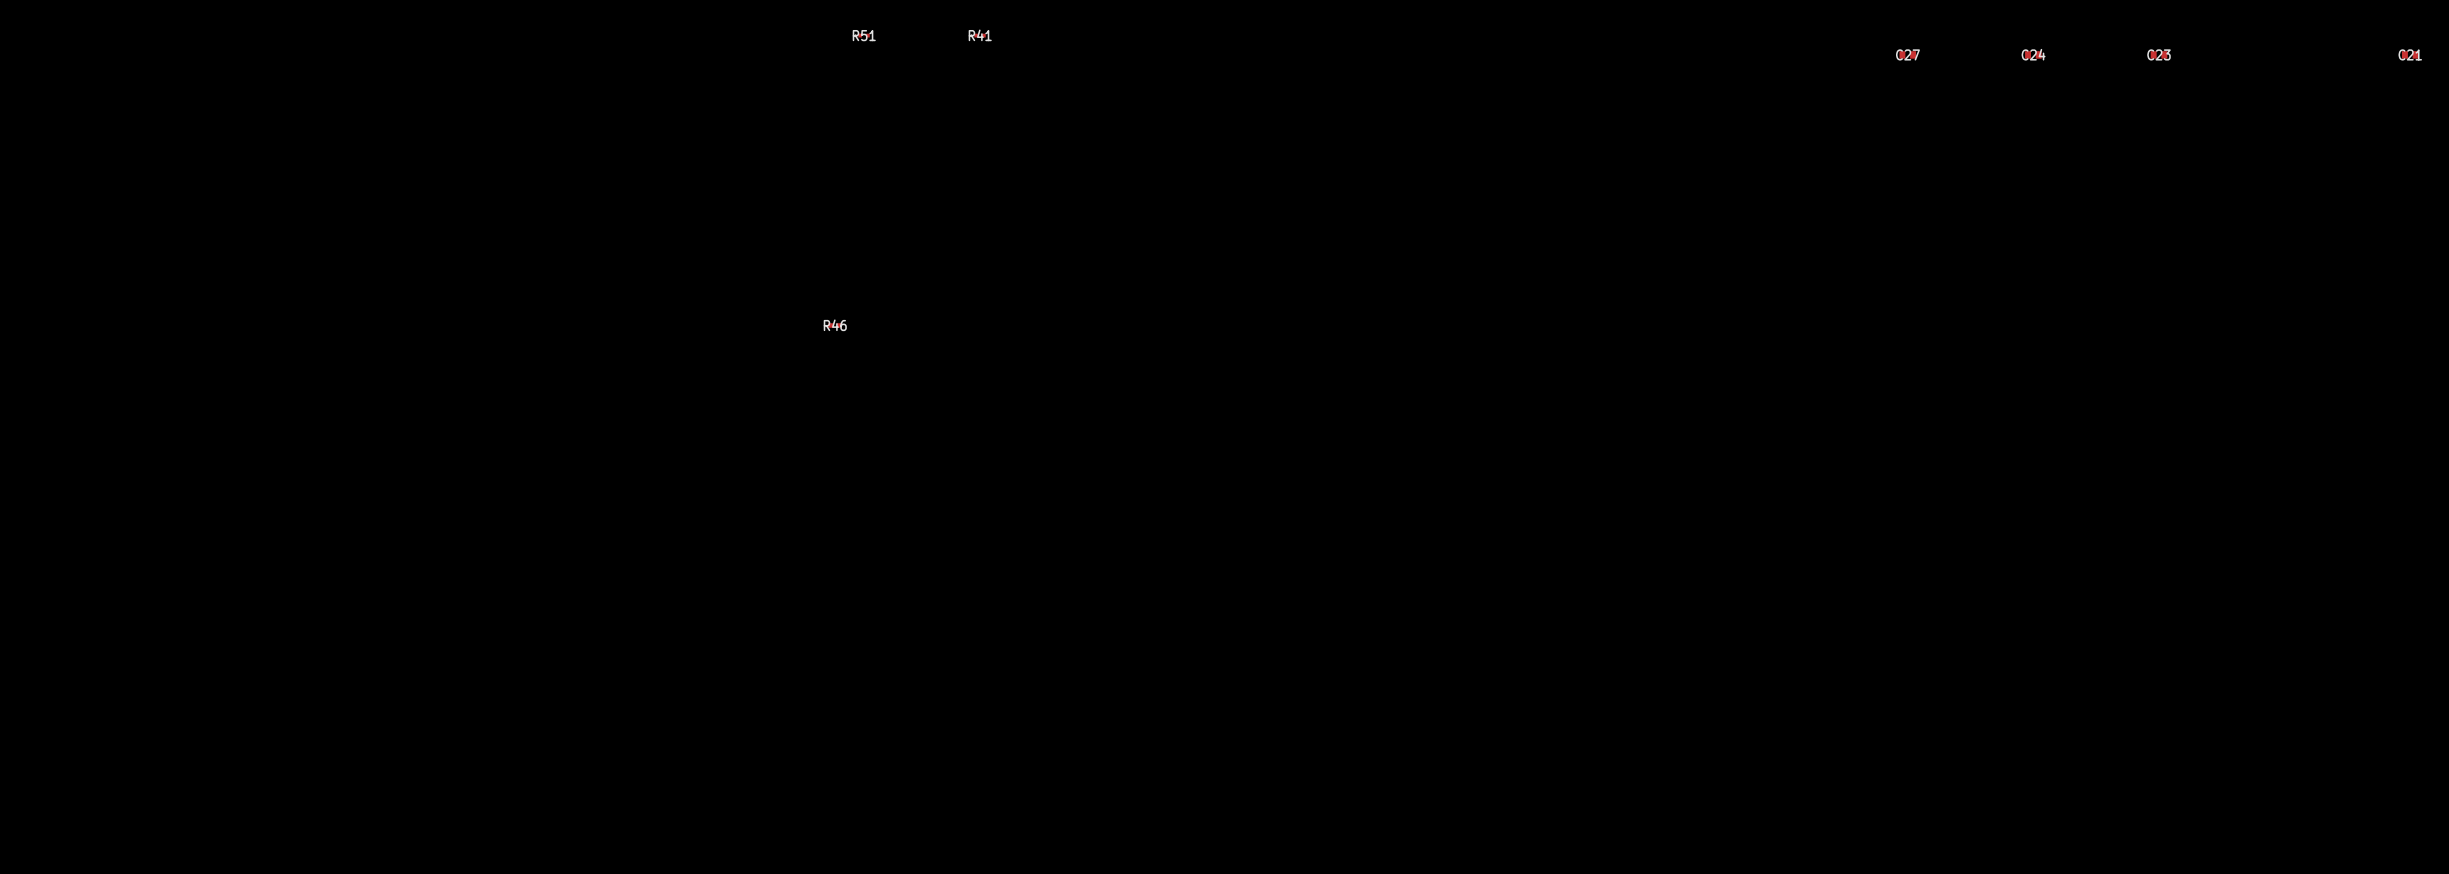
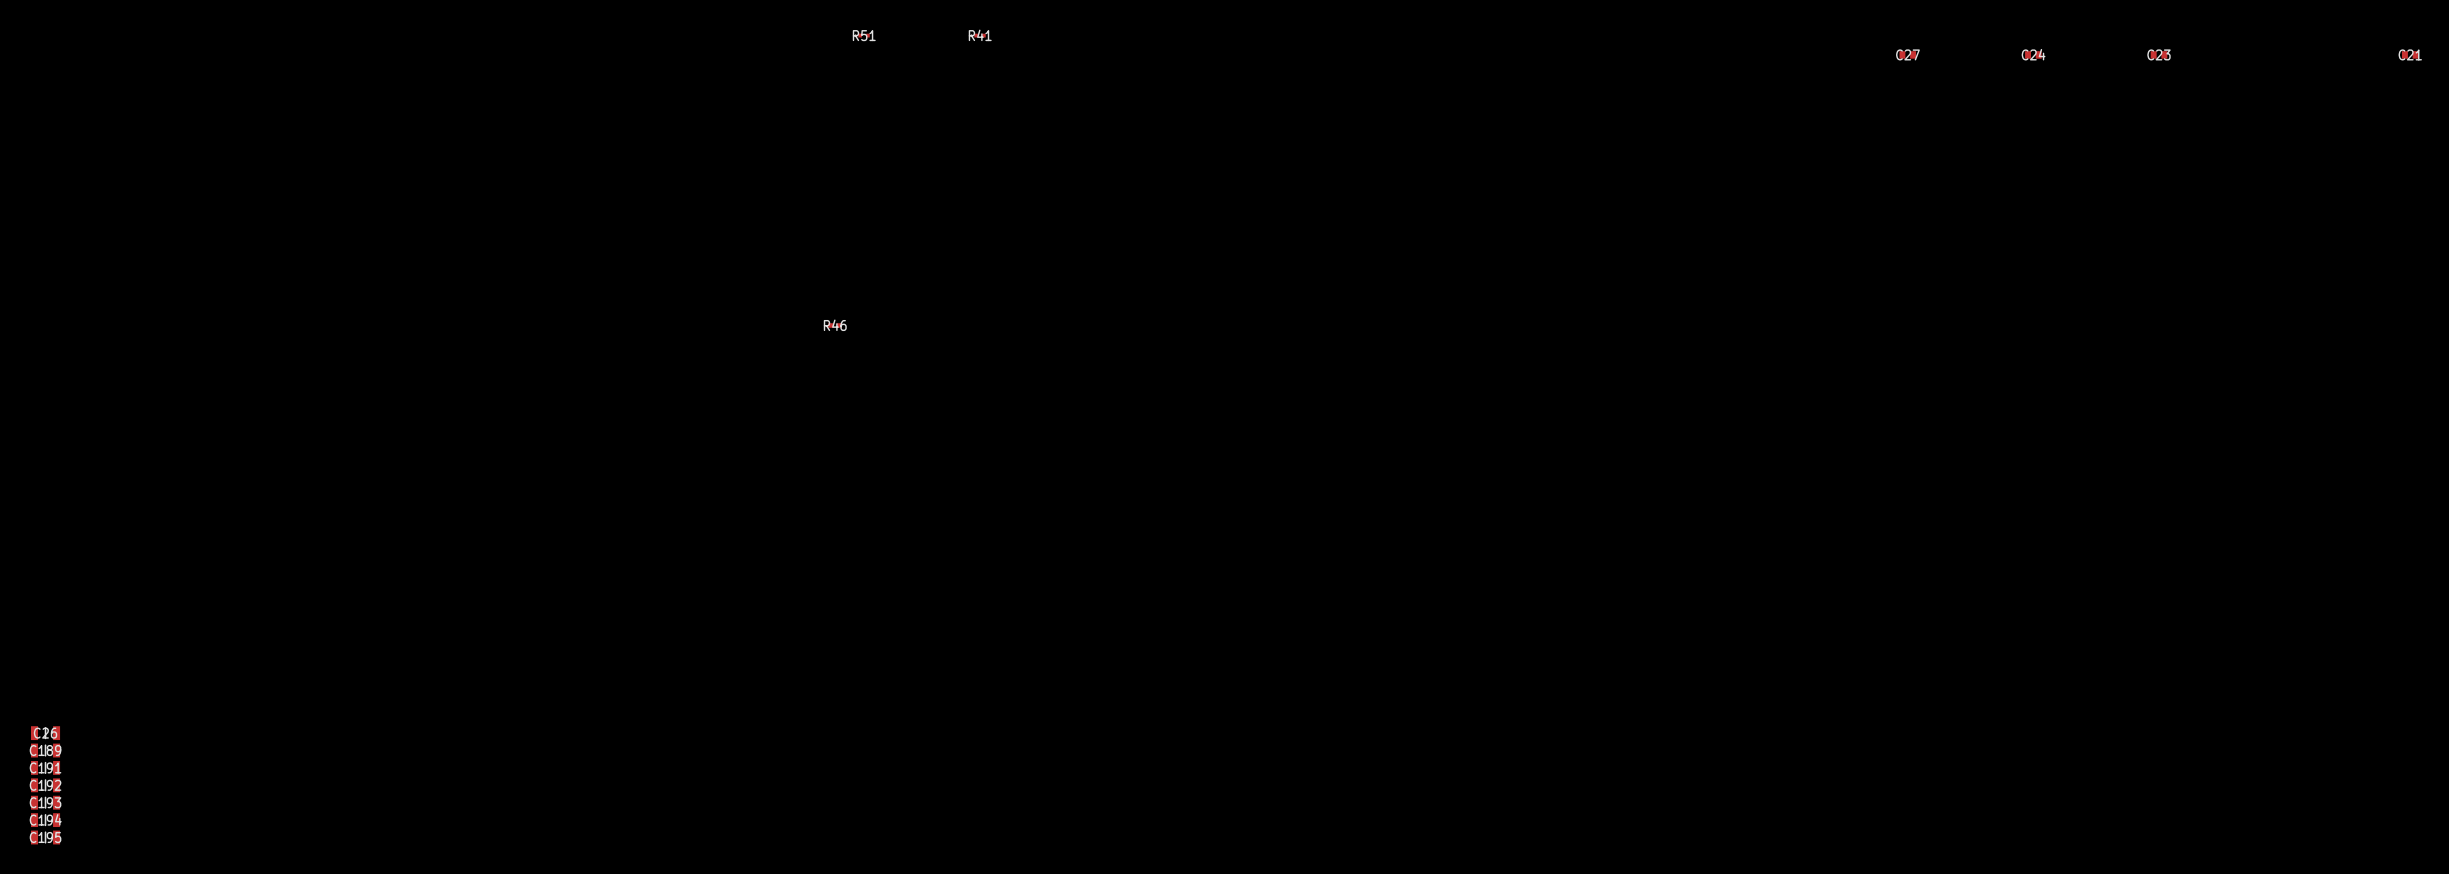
C26: none -> (45, 733)
C189: none -> (45, 750)
C191: none -> (45, 767)
C192: none -> (45, 785)
C193: none -> (45, 802)
C194: none -> (45, 820)
C195: none -> (45, 837)

